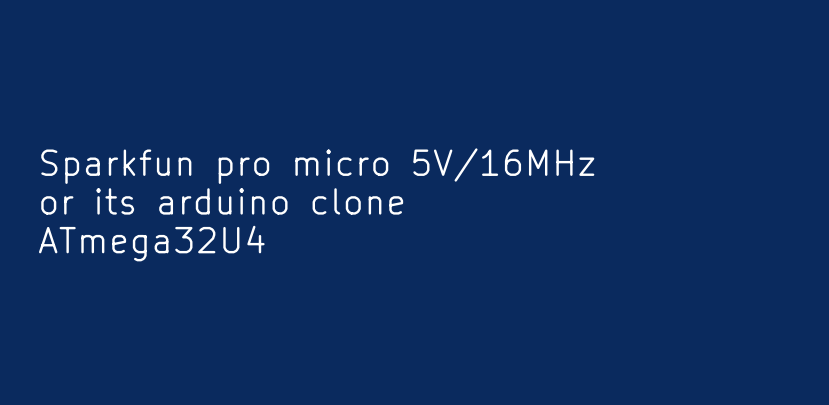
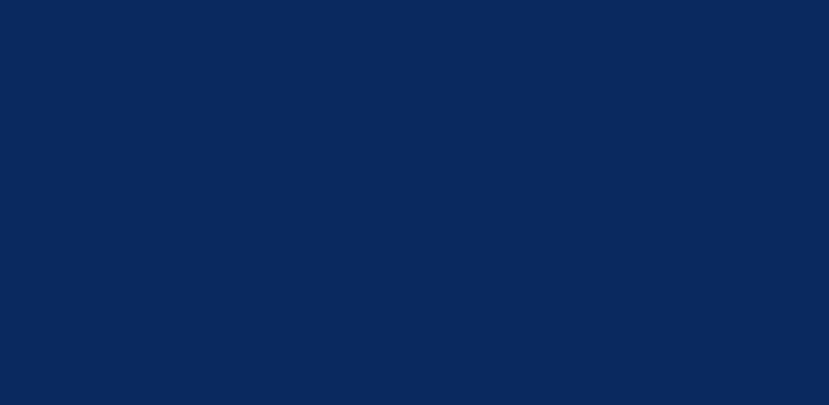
text: Sparkfun pro micro 5V/16MHz (317, 166) -> none
text: or its arduino clone (222, 201) -> none
text: ATmega32U4 (151, 243) -> none

